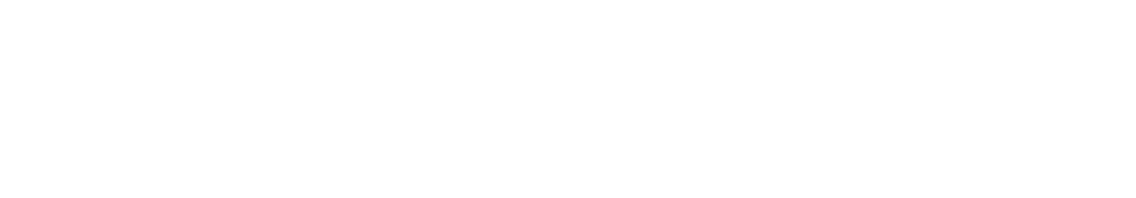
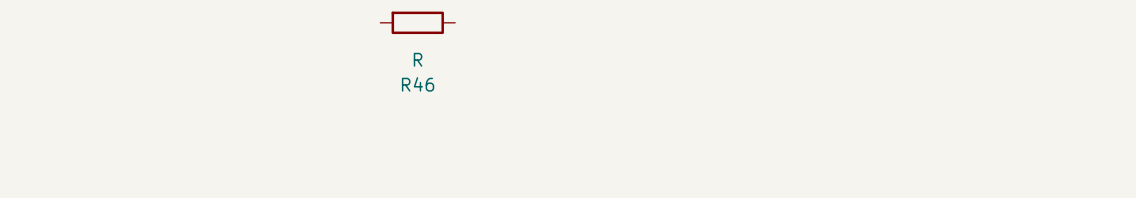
R46: none -> R (417, 22)

